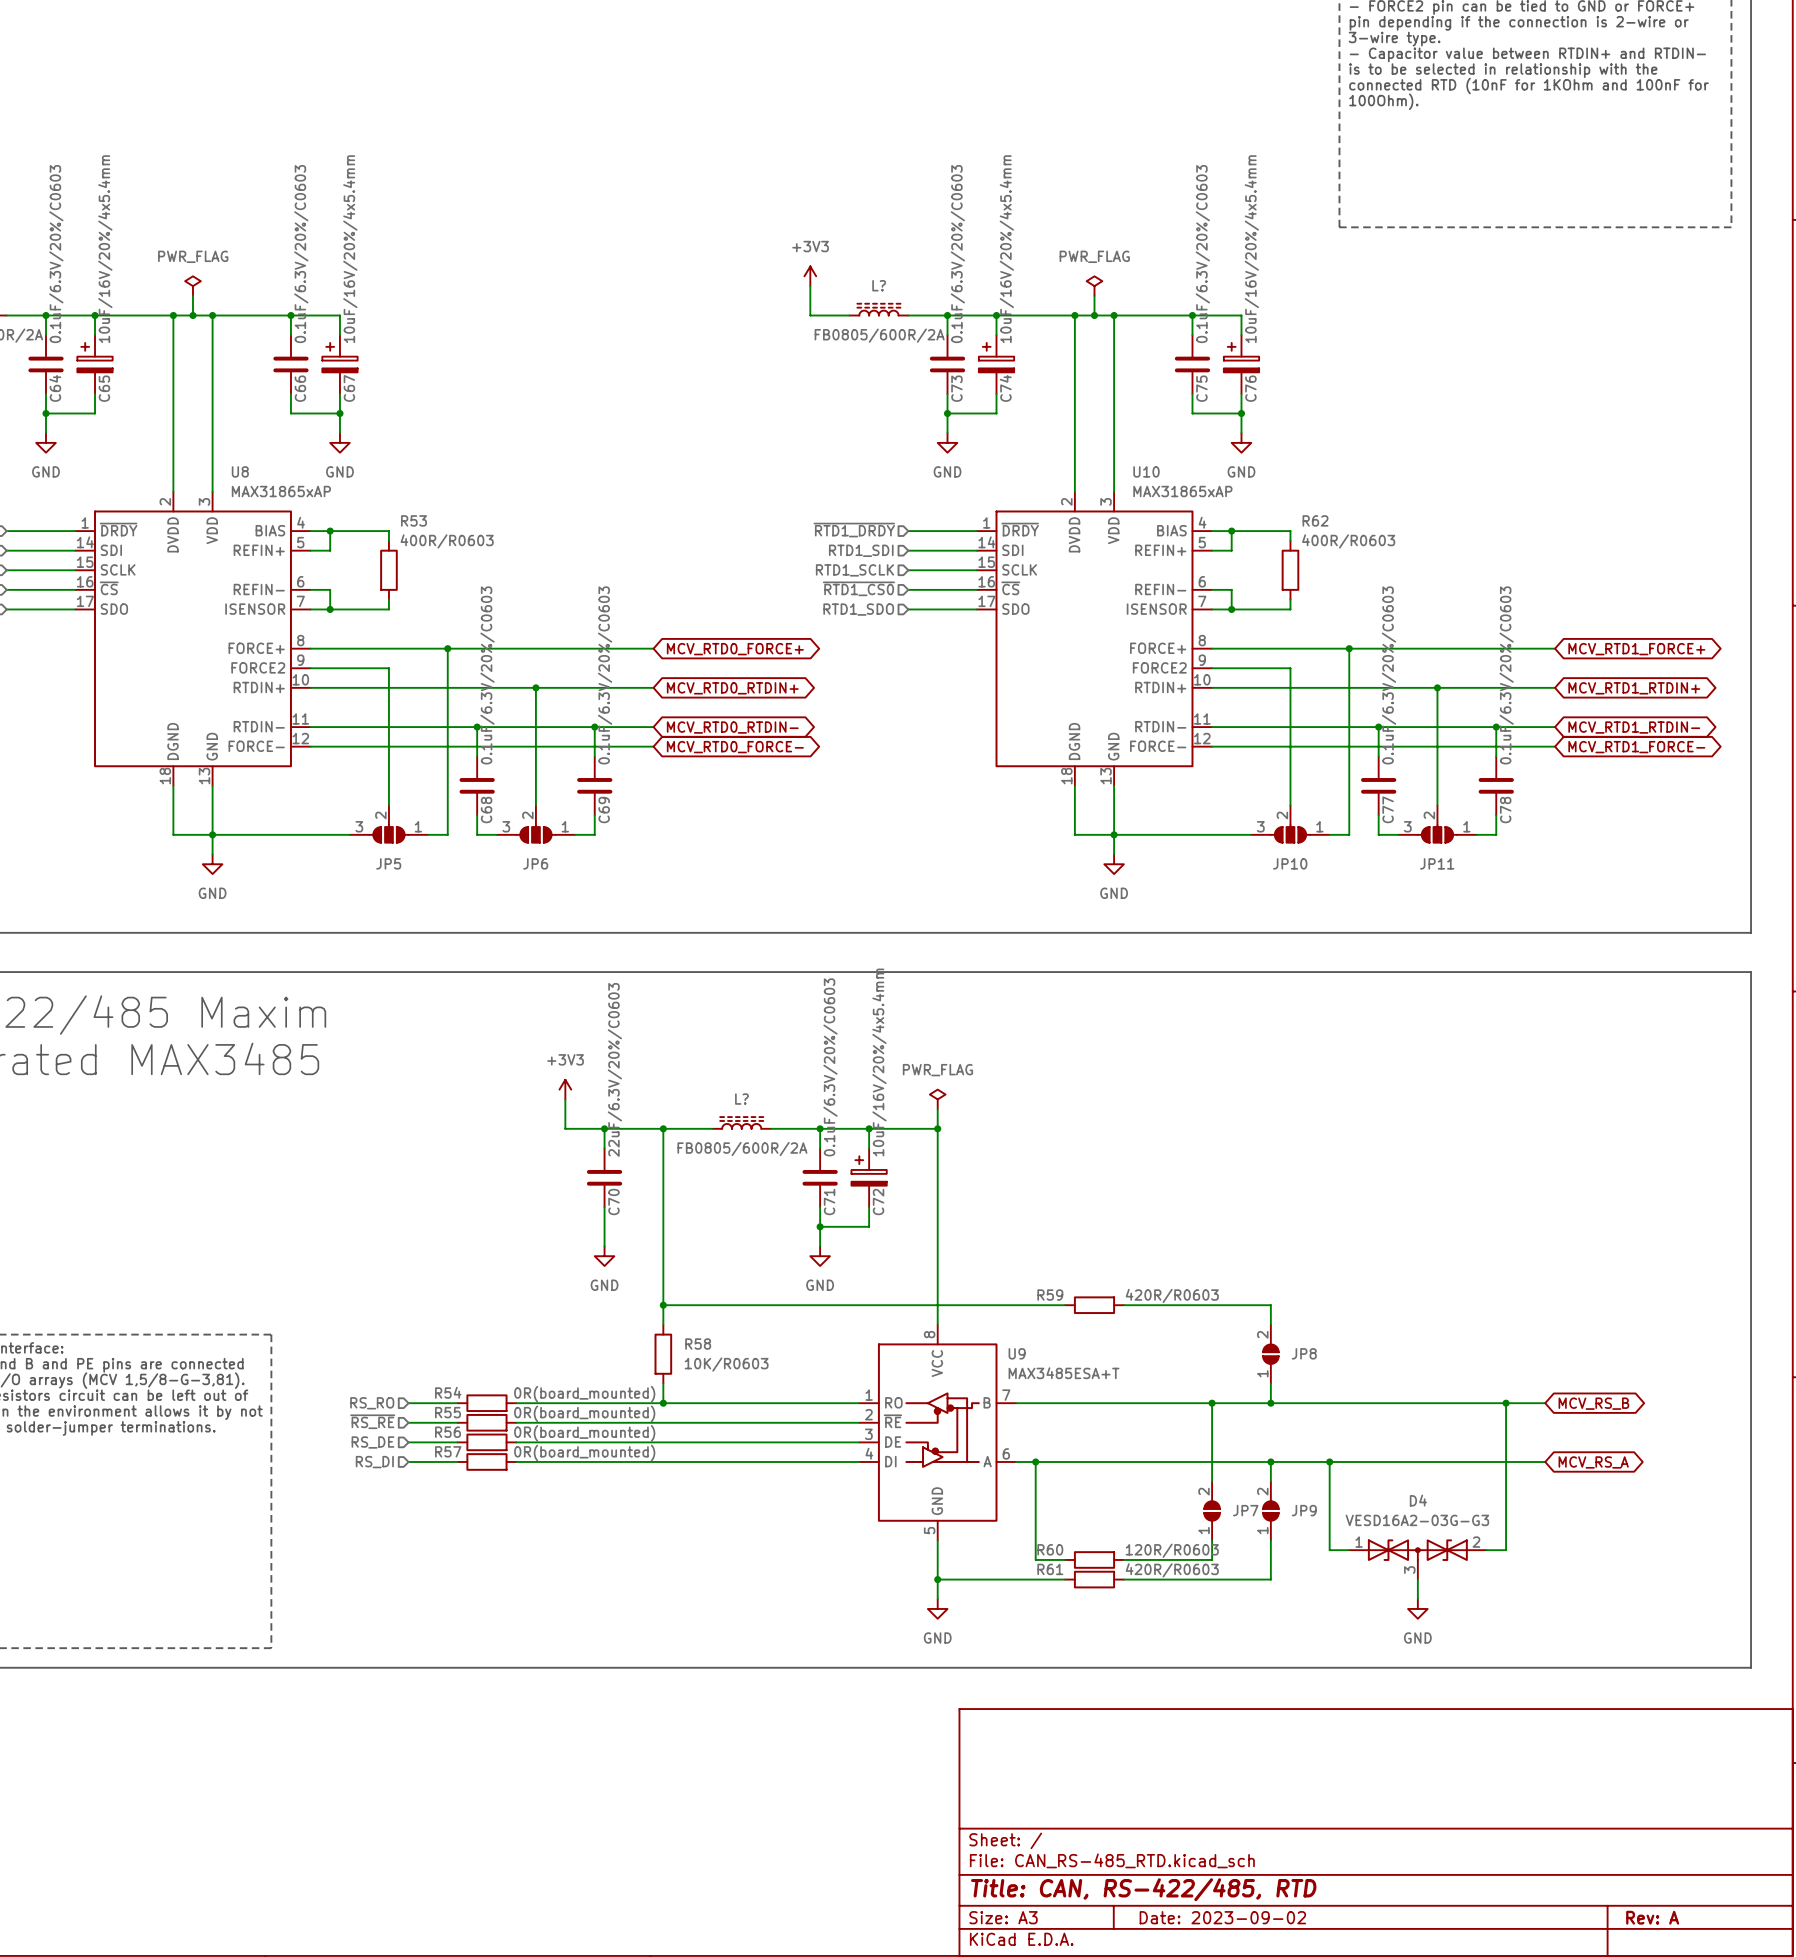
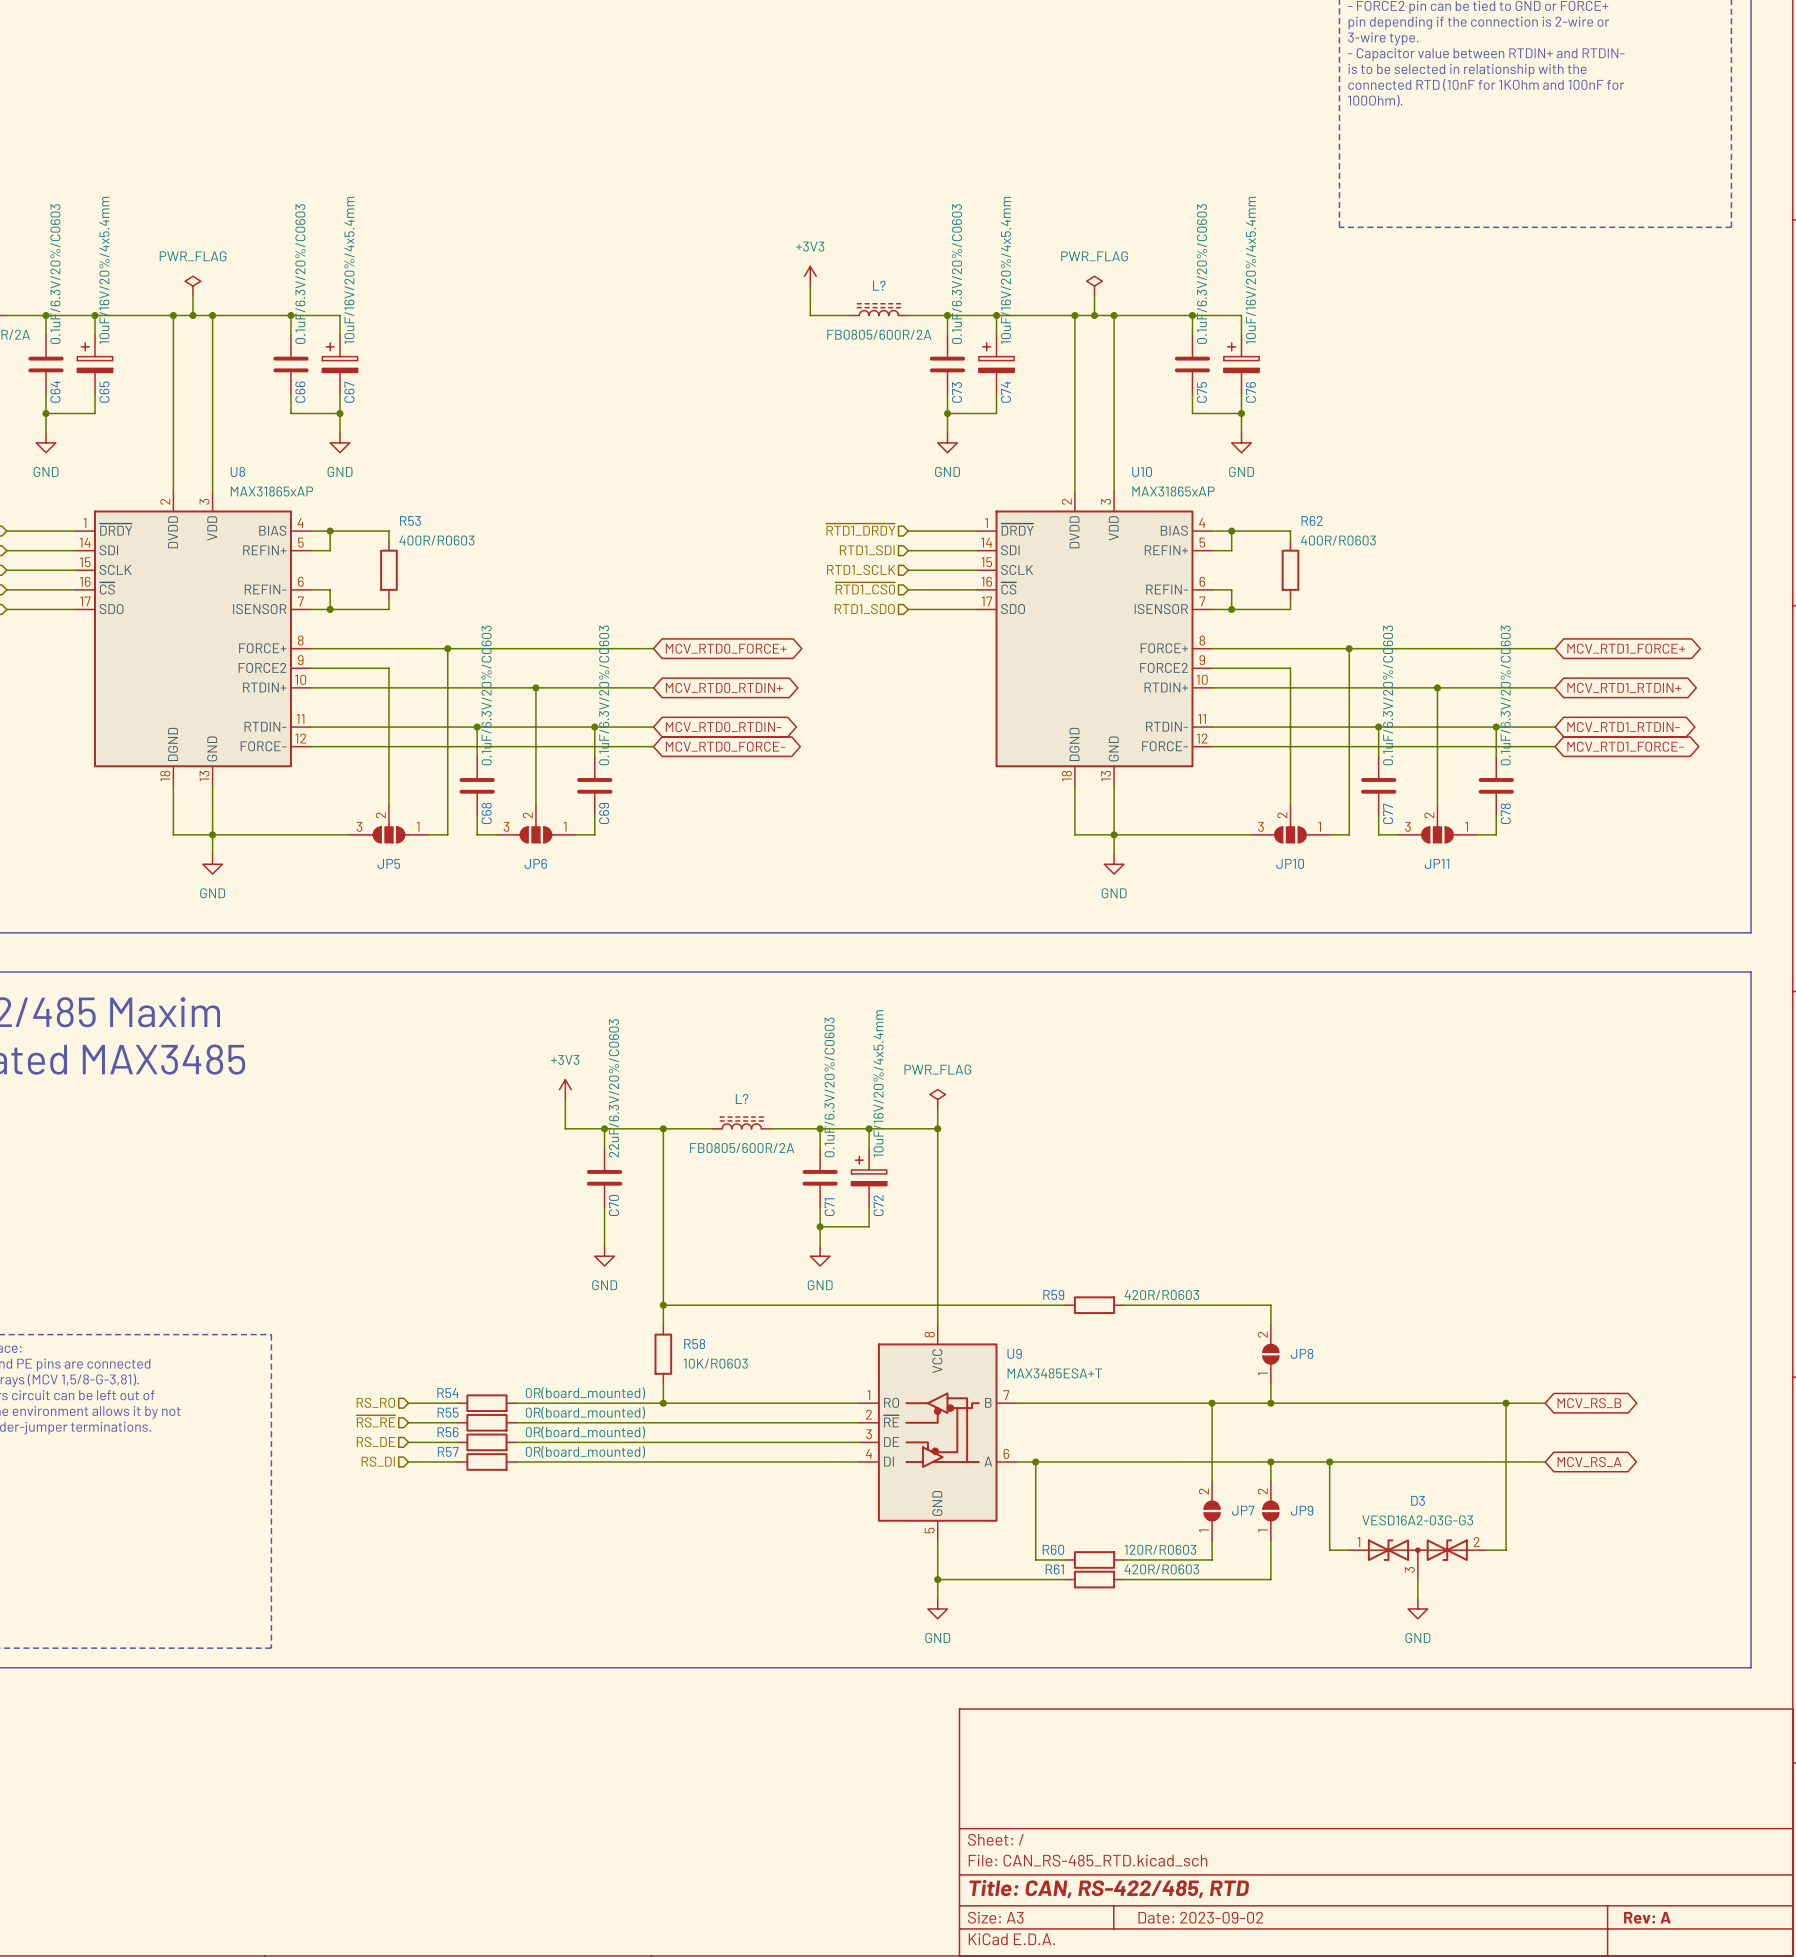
D4 name: D4 (1418, 1500) -> D3 (1418, 1500)

